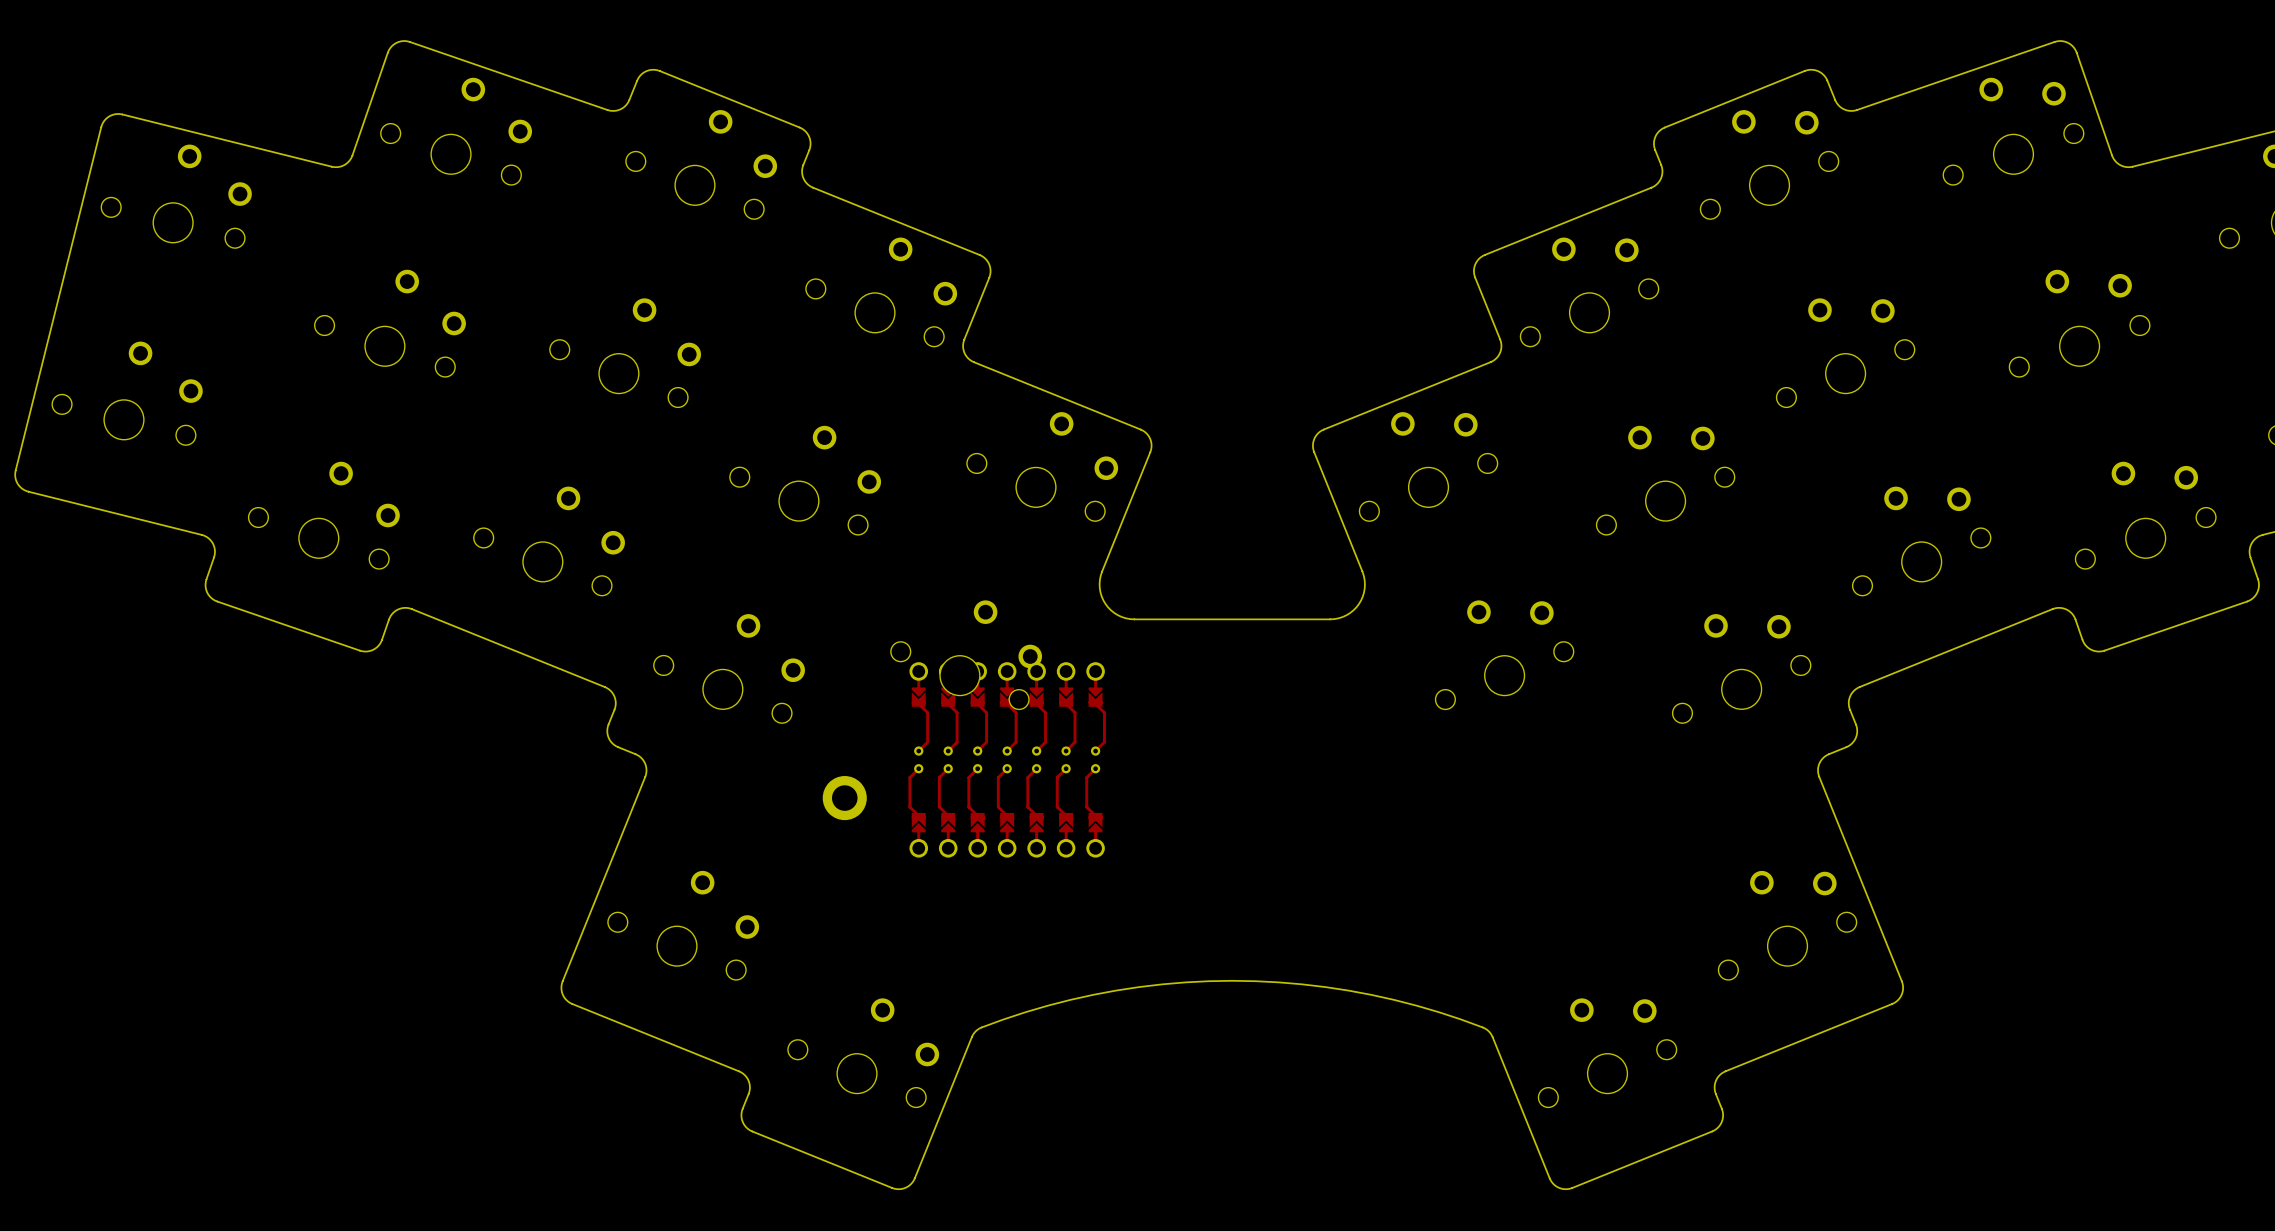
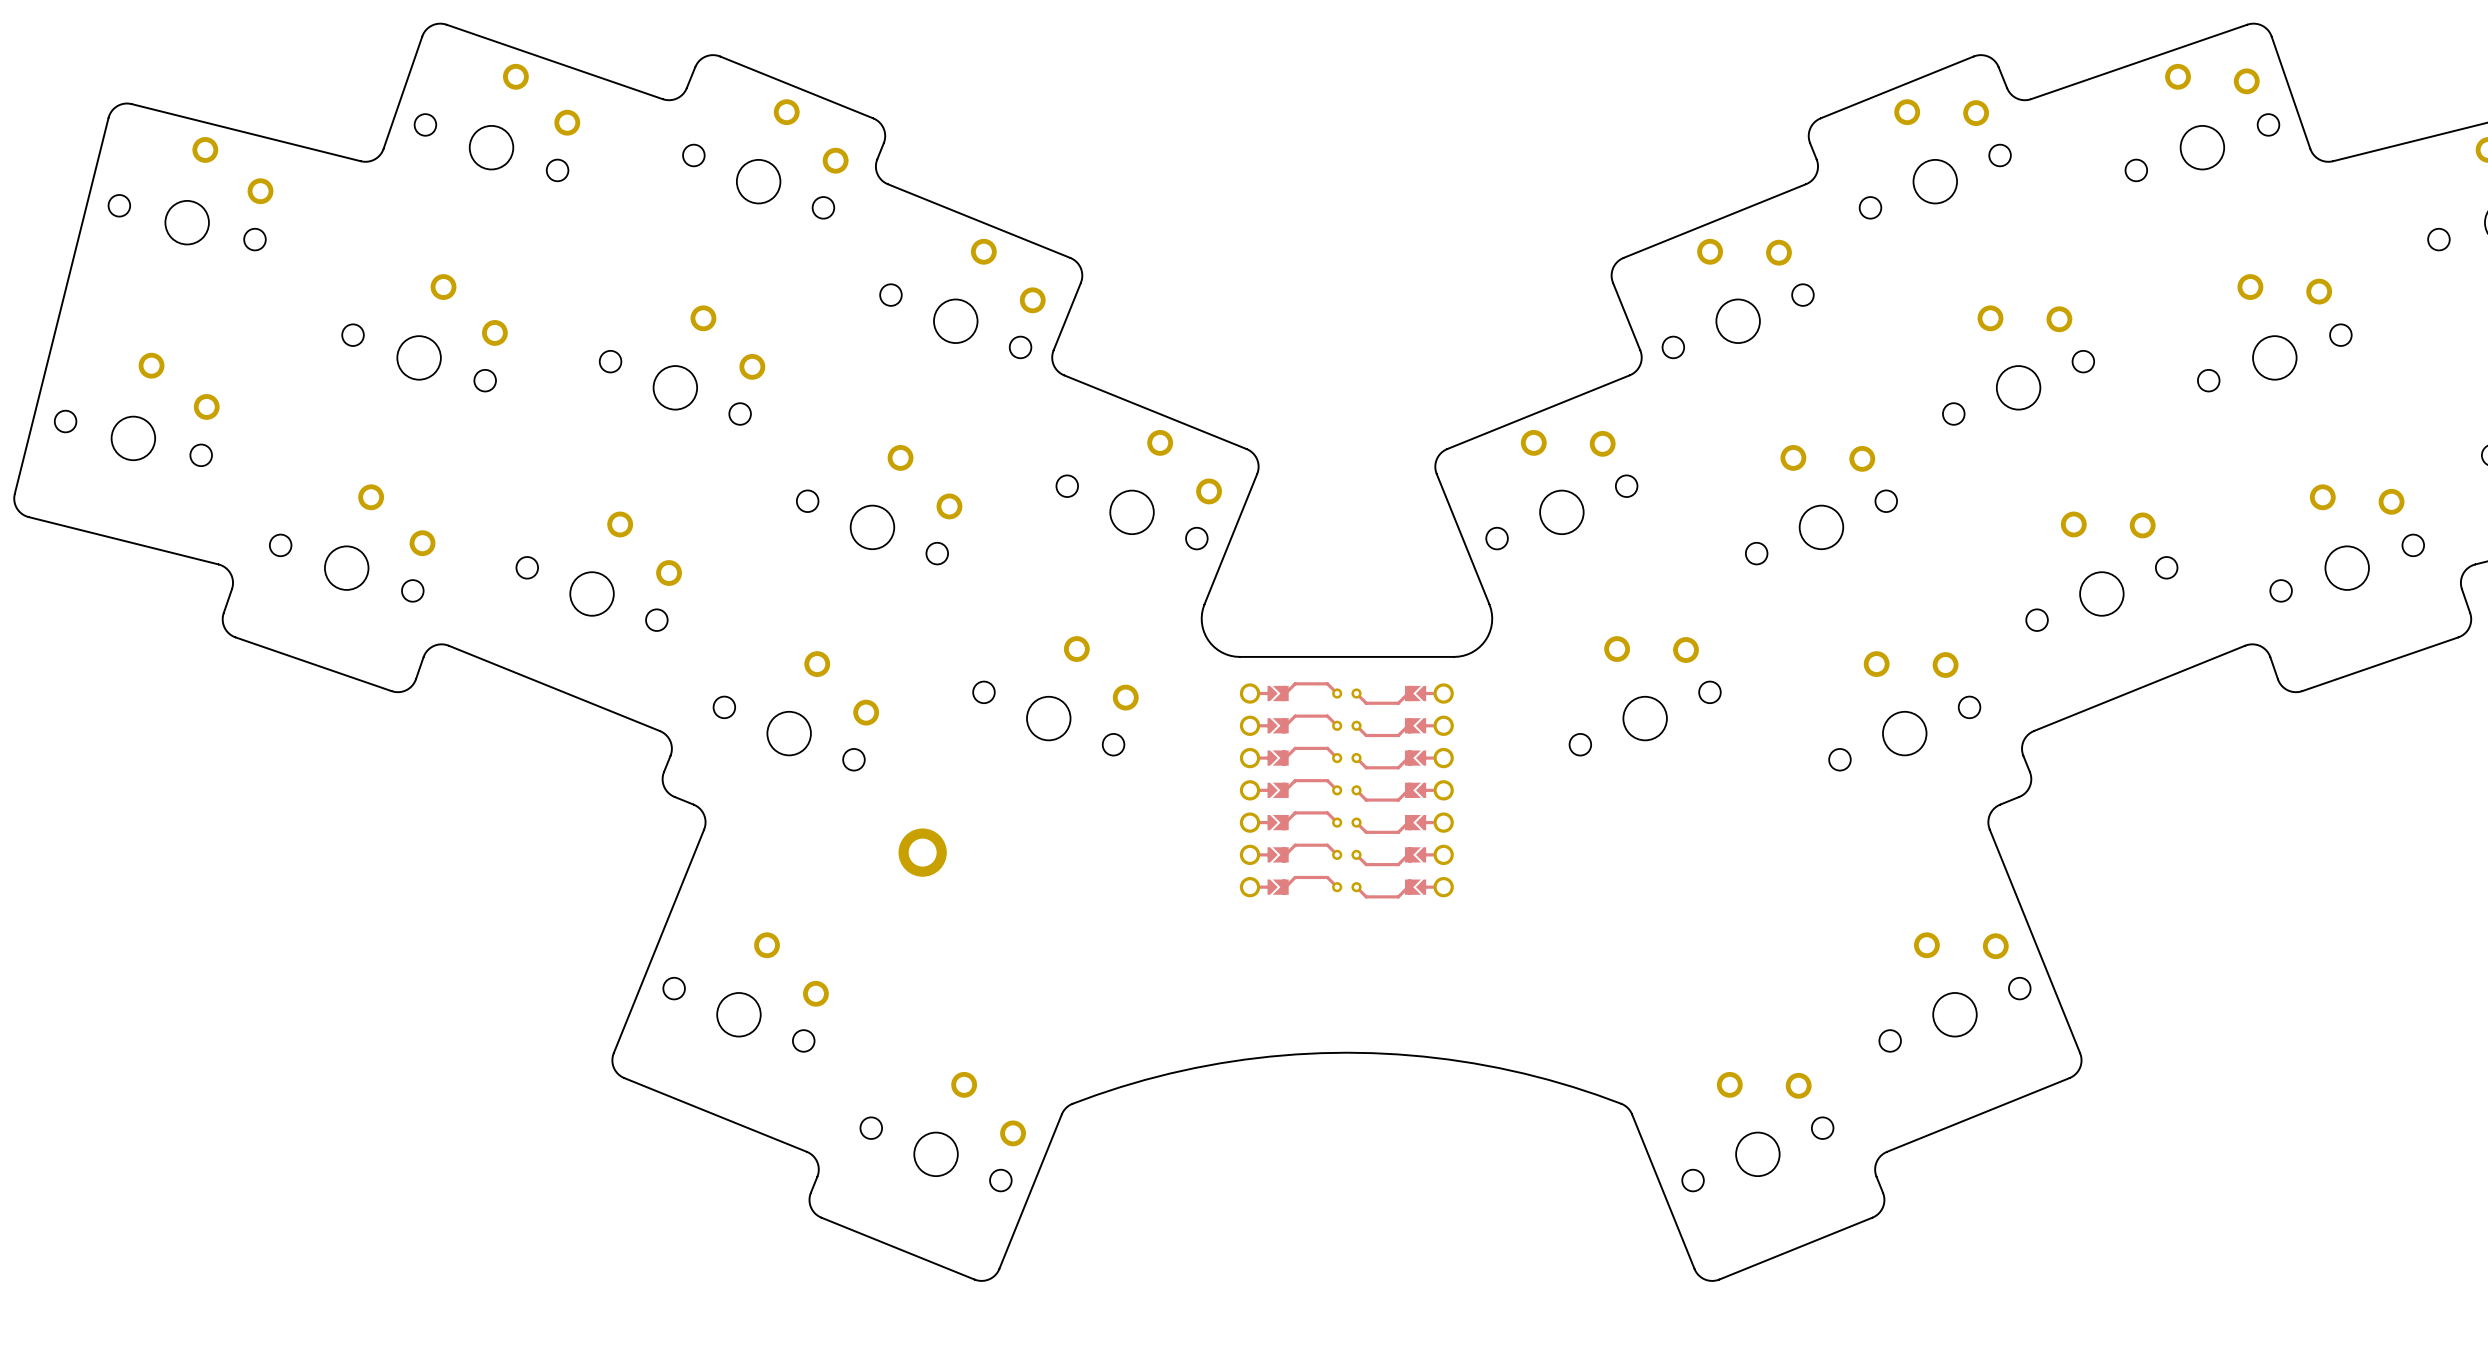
part rotation: 0° (1007, 759) -> 90° clockwise (1346, 790)
part position: (1007, 759) -> (1346, 790)

